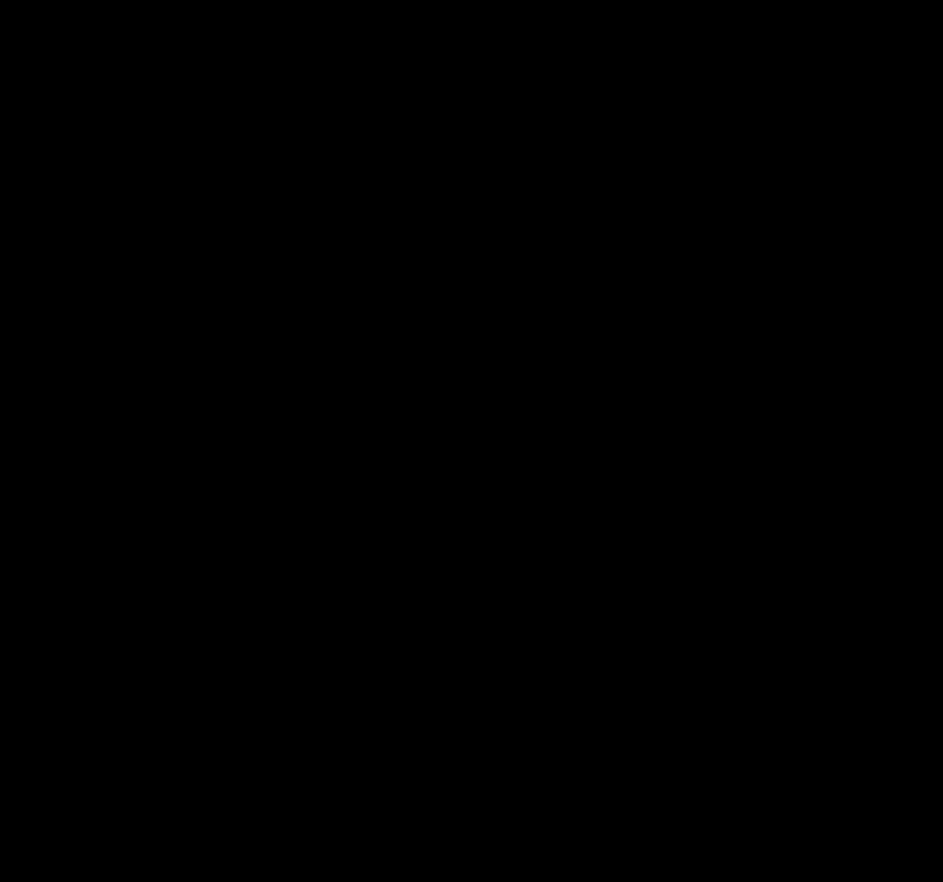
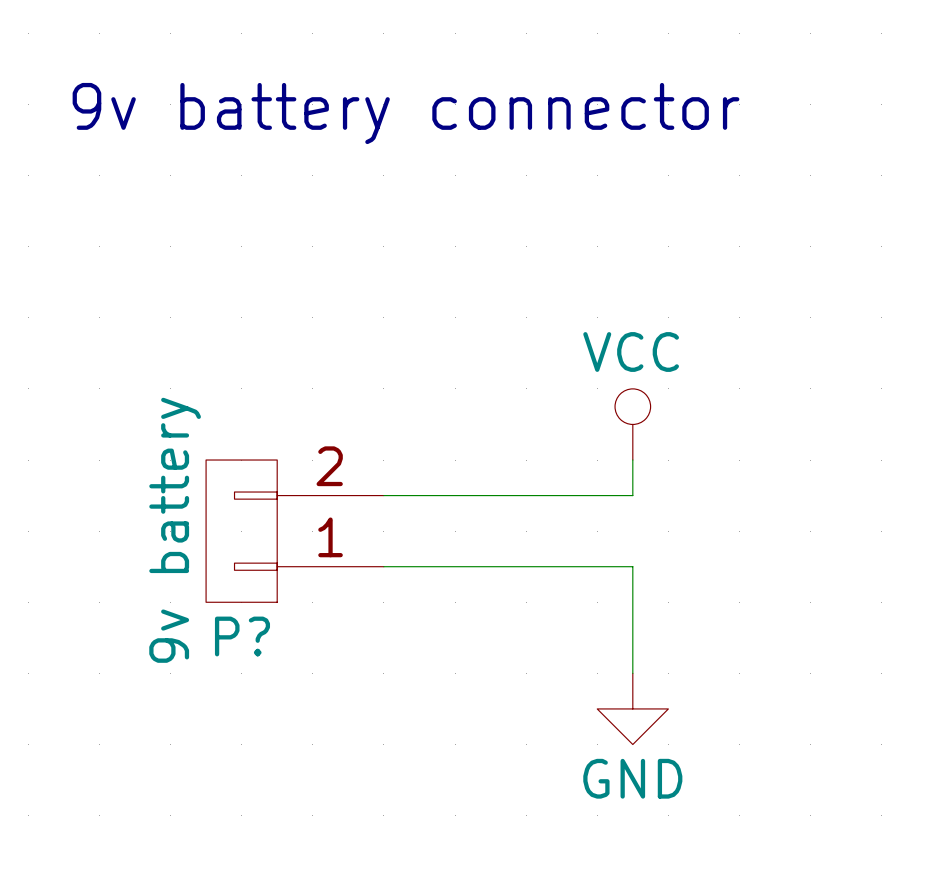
text: none -> 9v battery connector (405, 113)
power symbol: none -> VCC (632, 424)
wire: none -> (632, 460) (632, 495) (383, 495)
P?: none -> 9v battery (294, 531)
wire: none -> (383, 566) (632, 566) (632, 673)
power symbol: none -> GND (632, 708)

